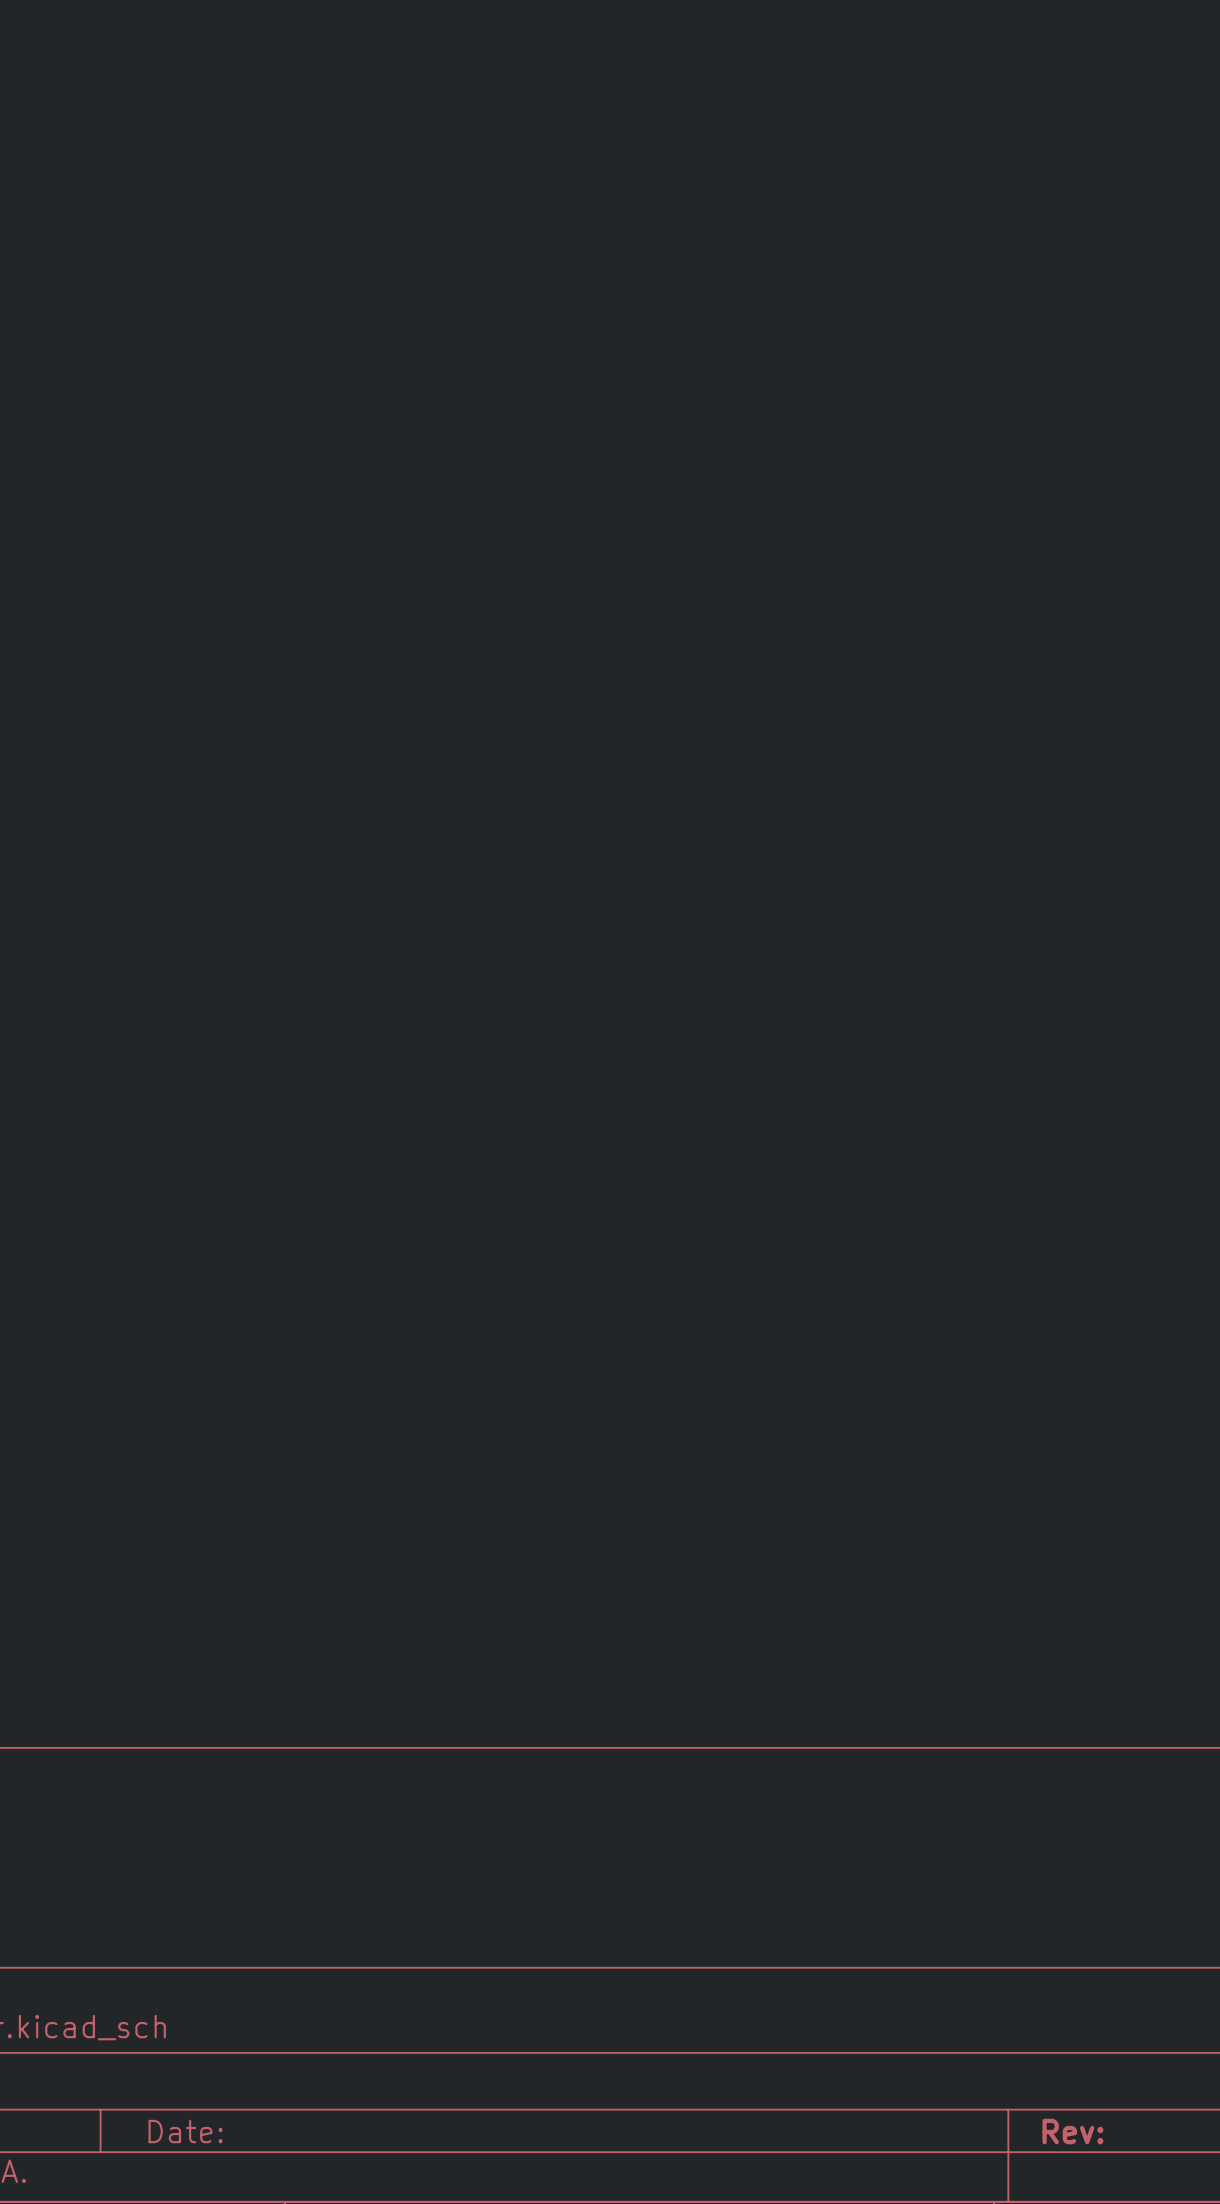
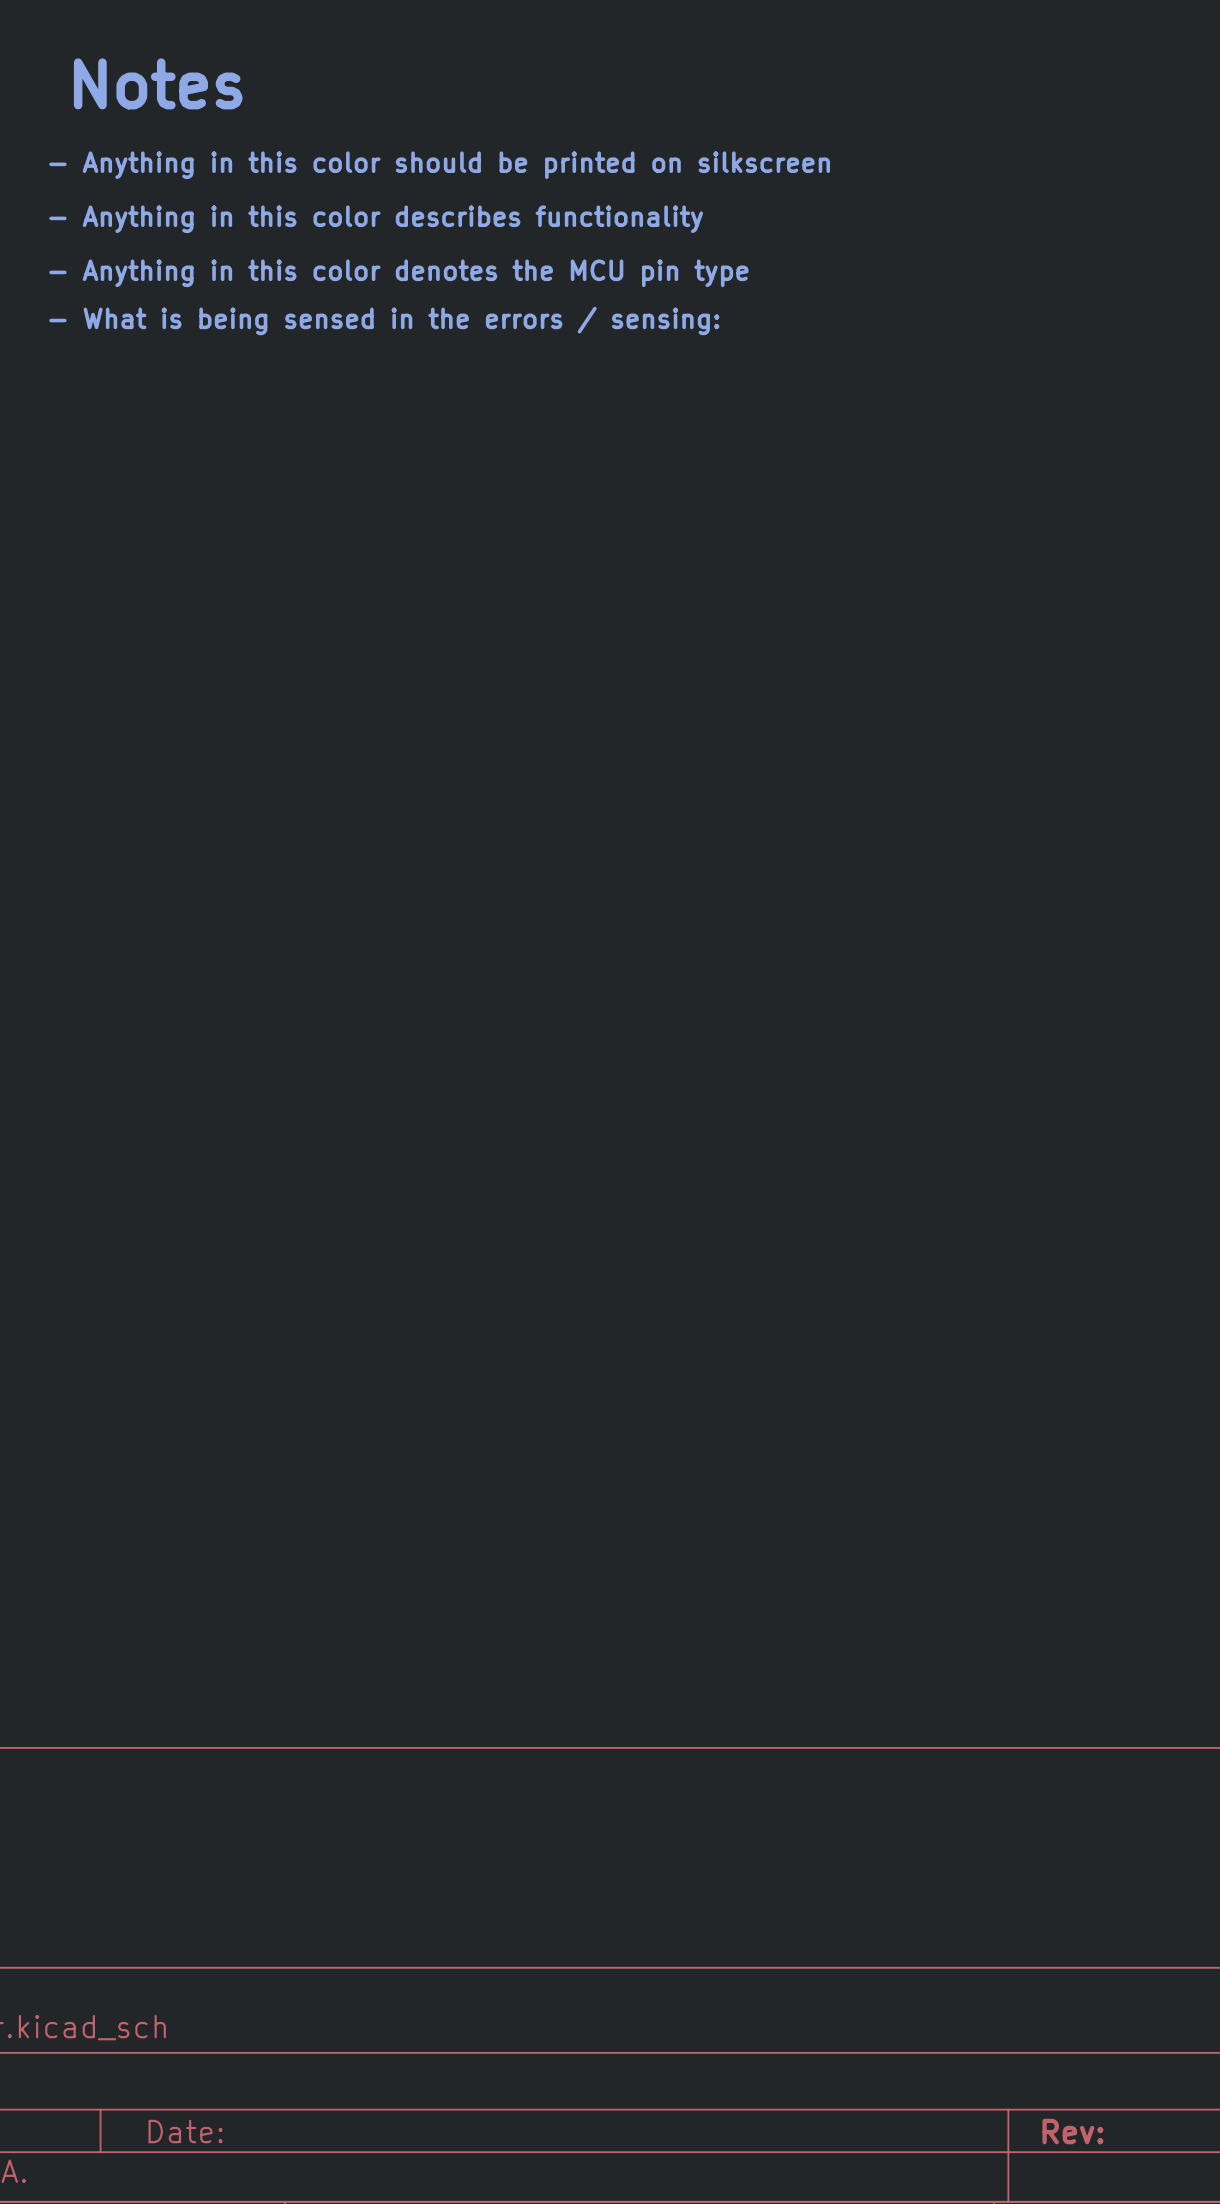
text: none -> Notes (158, 83)
text: none -> - Anything in this color should be printed on silkscreen (439, 165)
text: none -> - Anything in this color describes functionality (376, 219)
text: none -> - Anything in this color denotes the MCU pin type (398, 273)
text: none -> - What is being sensed in the errors / sensing: (384, 320)

